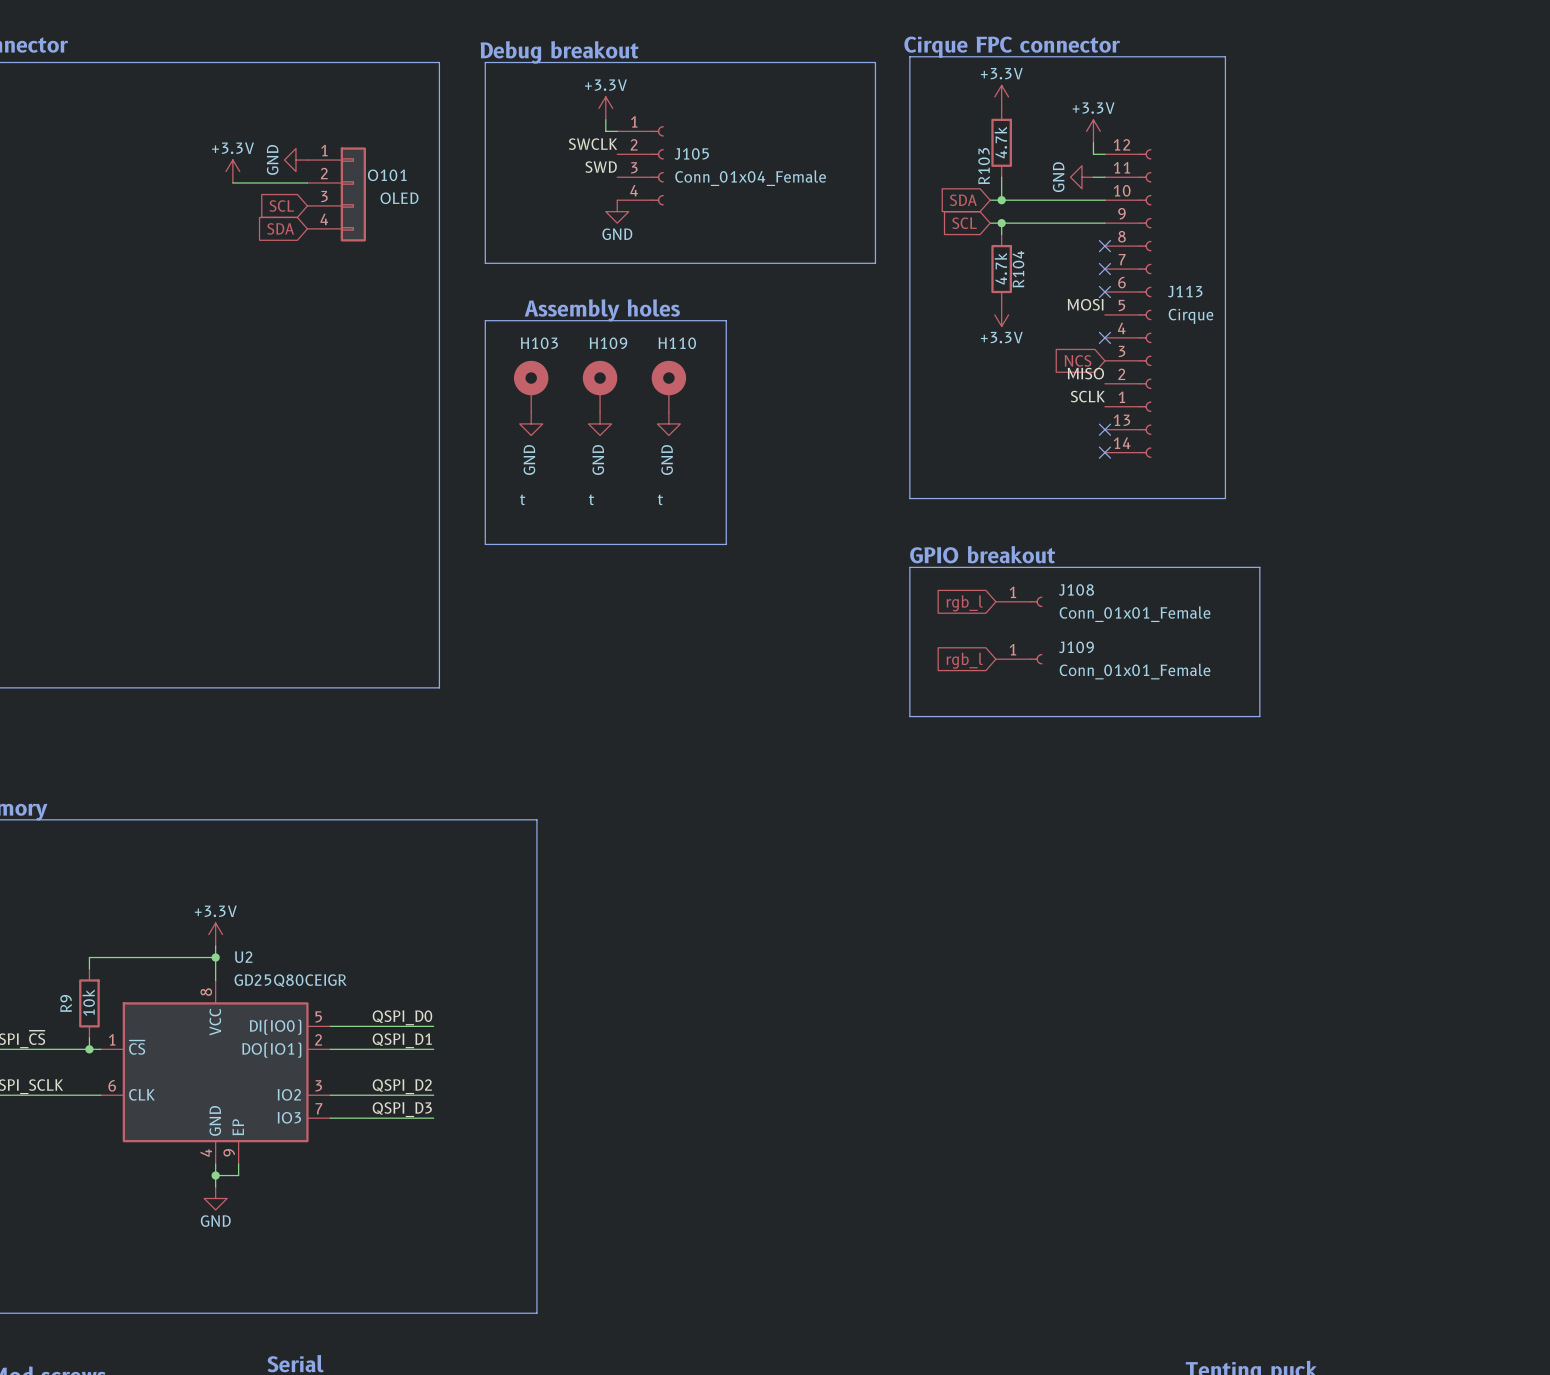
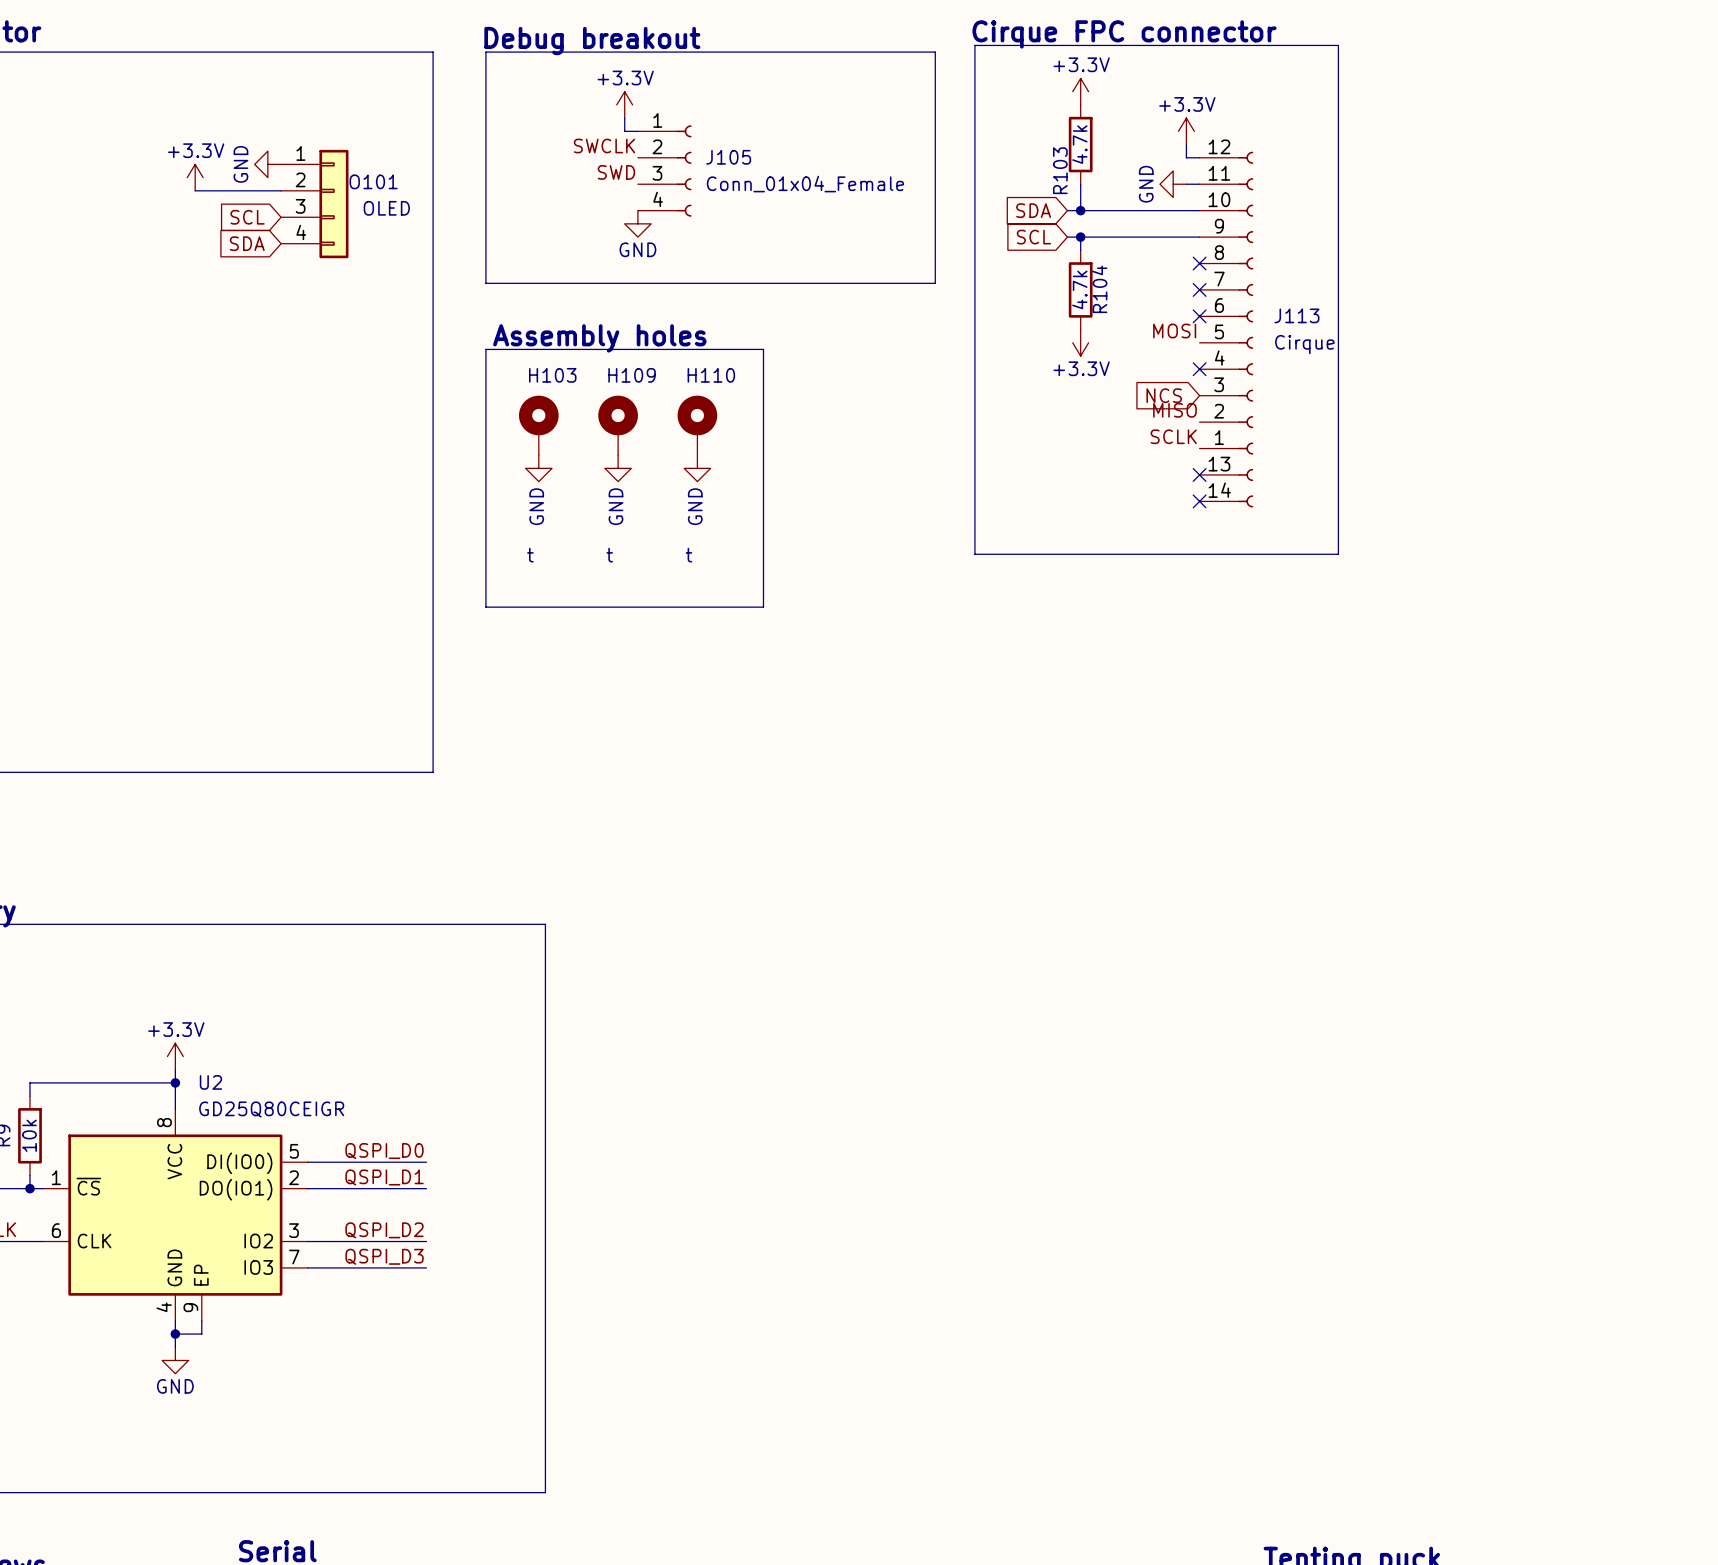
text: GPIO breakout (982, 554) -> none
line: (909, 567) (909, 716) (1259, 716) (1259, 567) (909, 567) -> none
J108: Conn_01x01_Female (1019, 601) -> none
global label: rgb_l (964, 603) -> none
J109: Conn_01x01_Female (1019, 659) -> none
global label: rgb_l (964, 660) -> none

